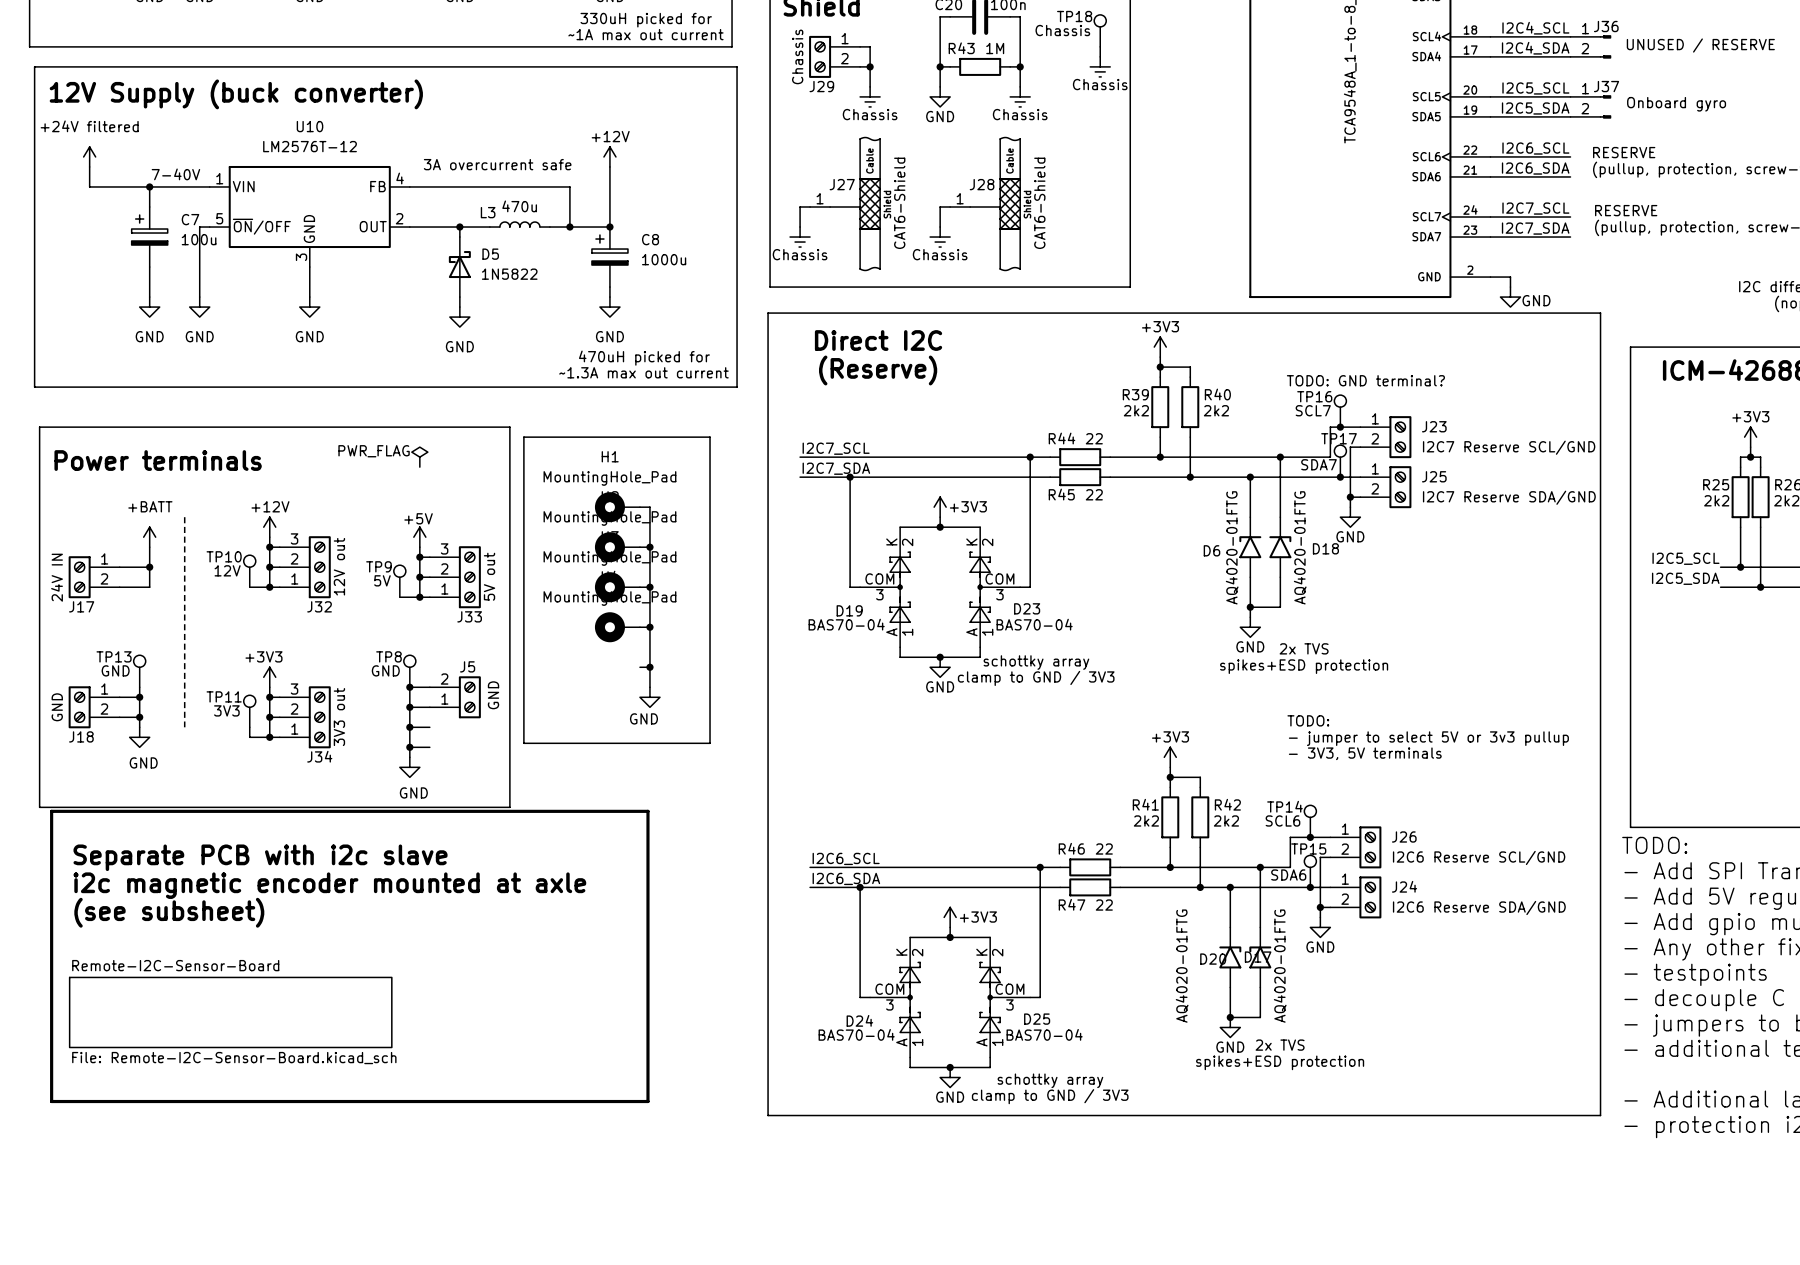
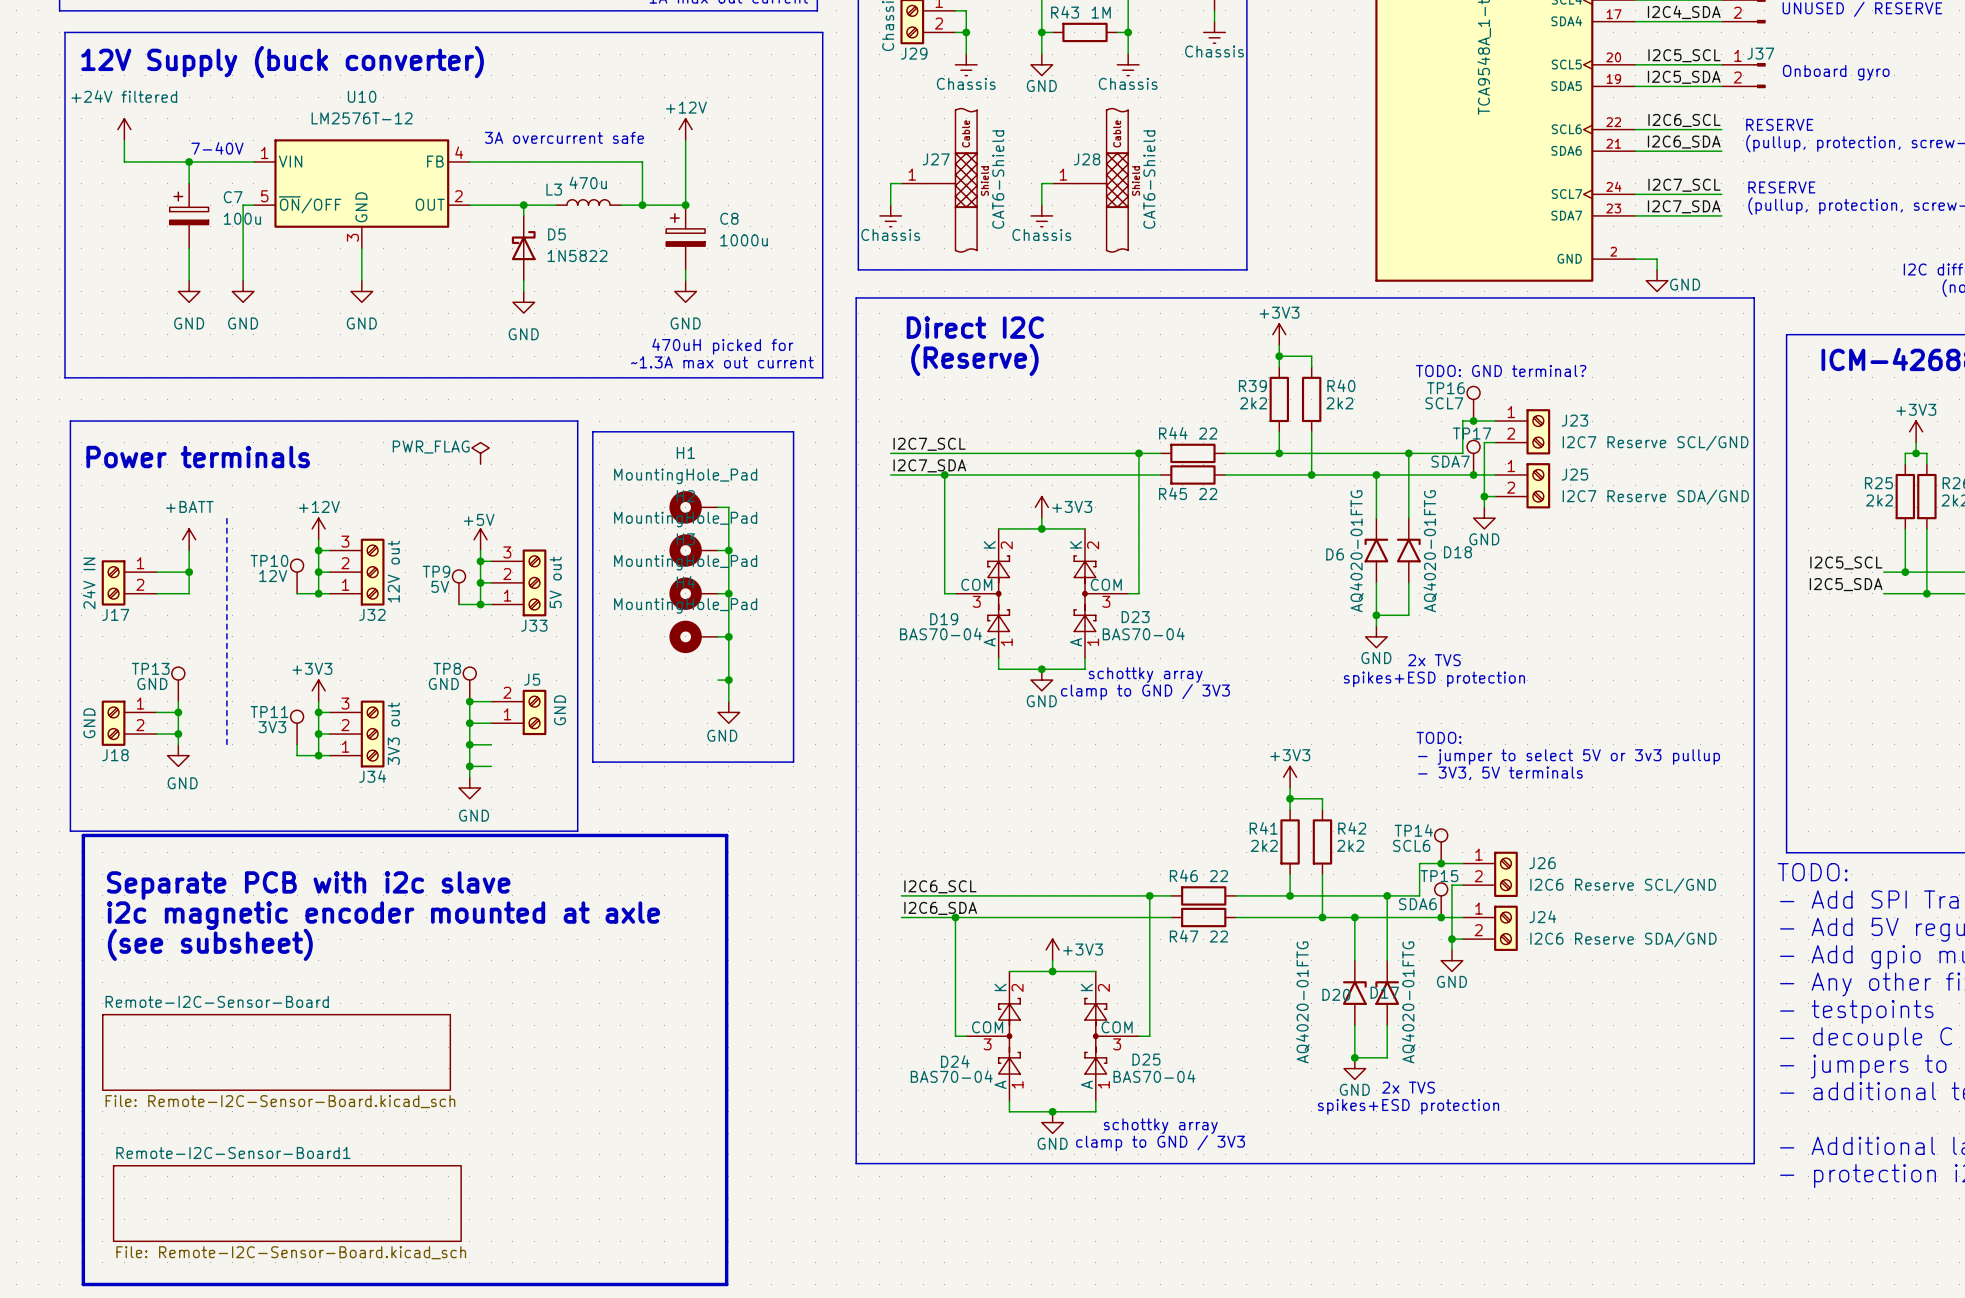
line: (51, 1101) (647, 1101) -> (83, 1148) (83, 1284) (726, 1284) (726, 1148)
sheet Remote-I2C-Sensor-Board1: none -> File: Remote-I2C-Sensor-Board.kicad_sch (287, 1203)

